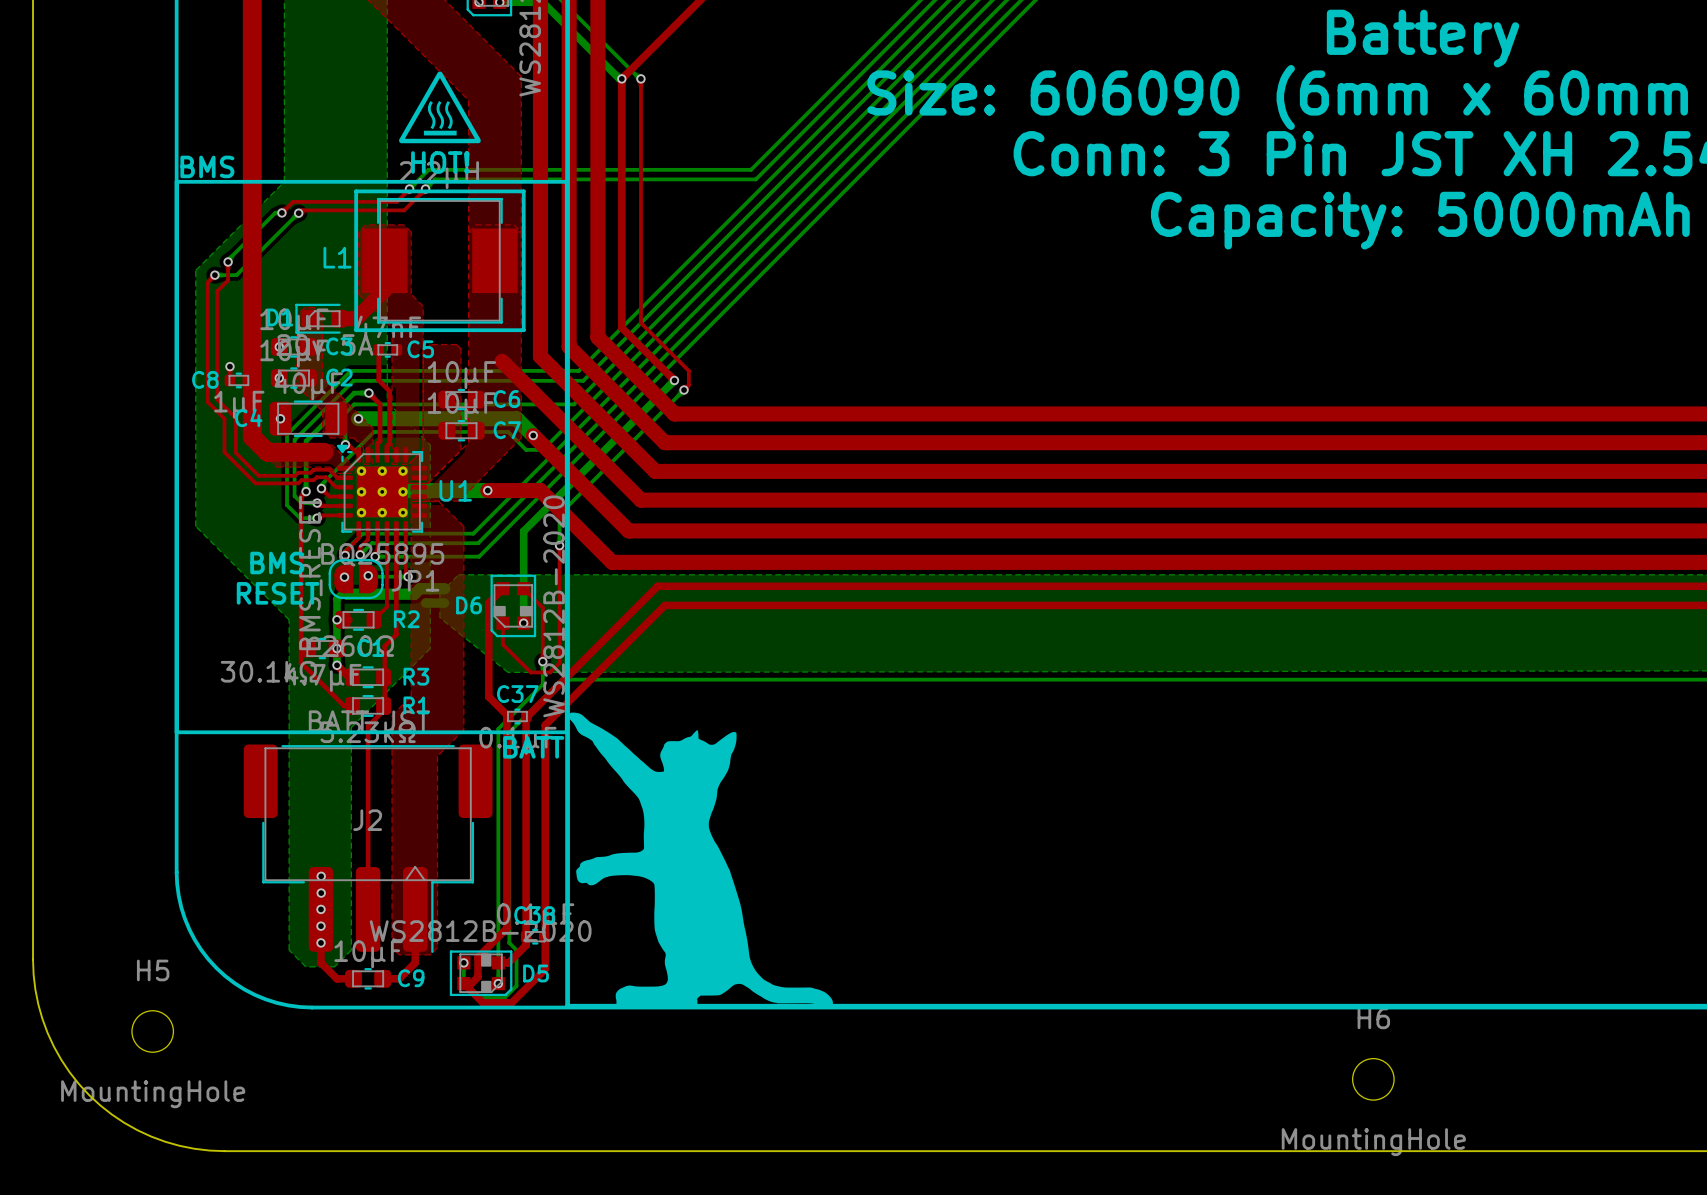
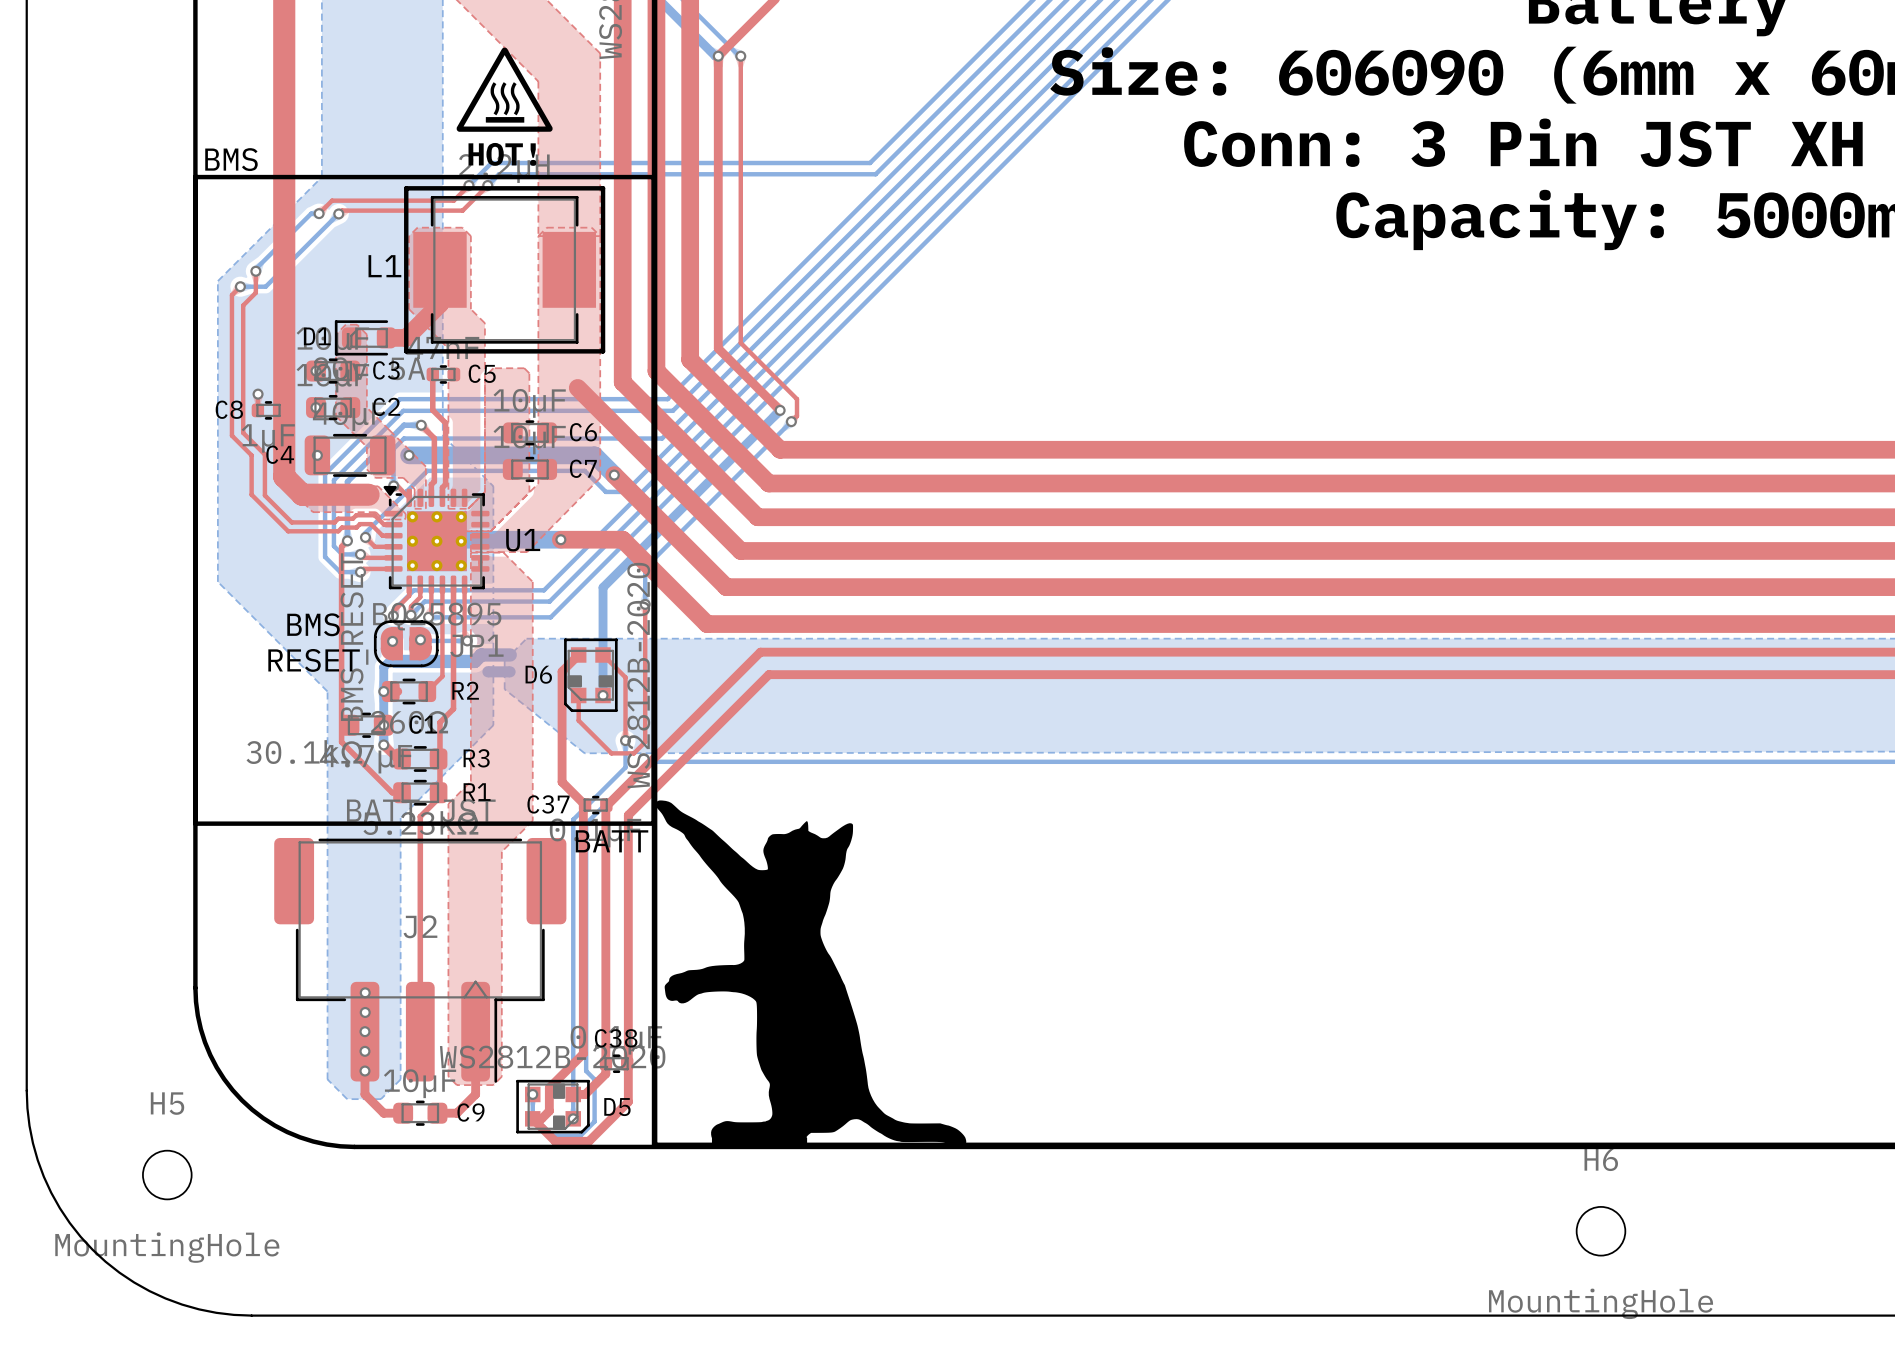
C37 name position: C37 (517, 694) -> C37 (548, 804)

